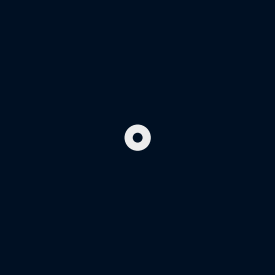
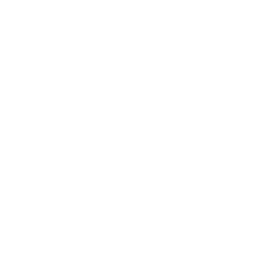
via: (137, 137) -> none

